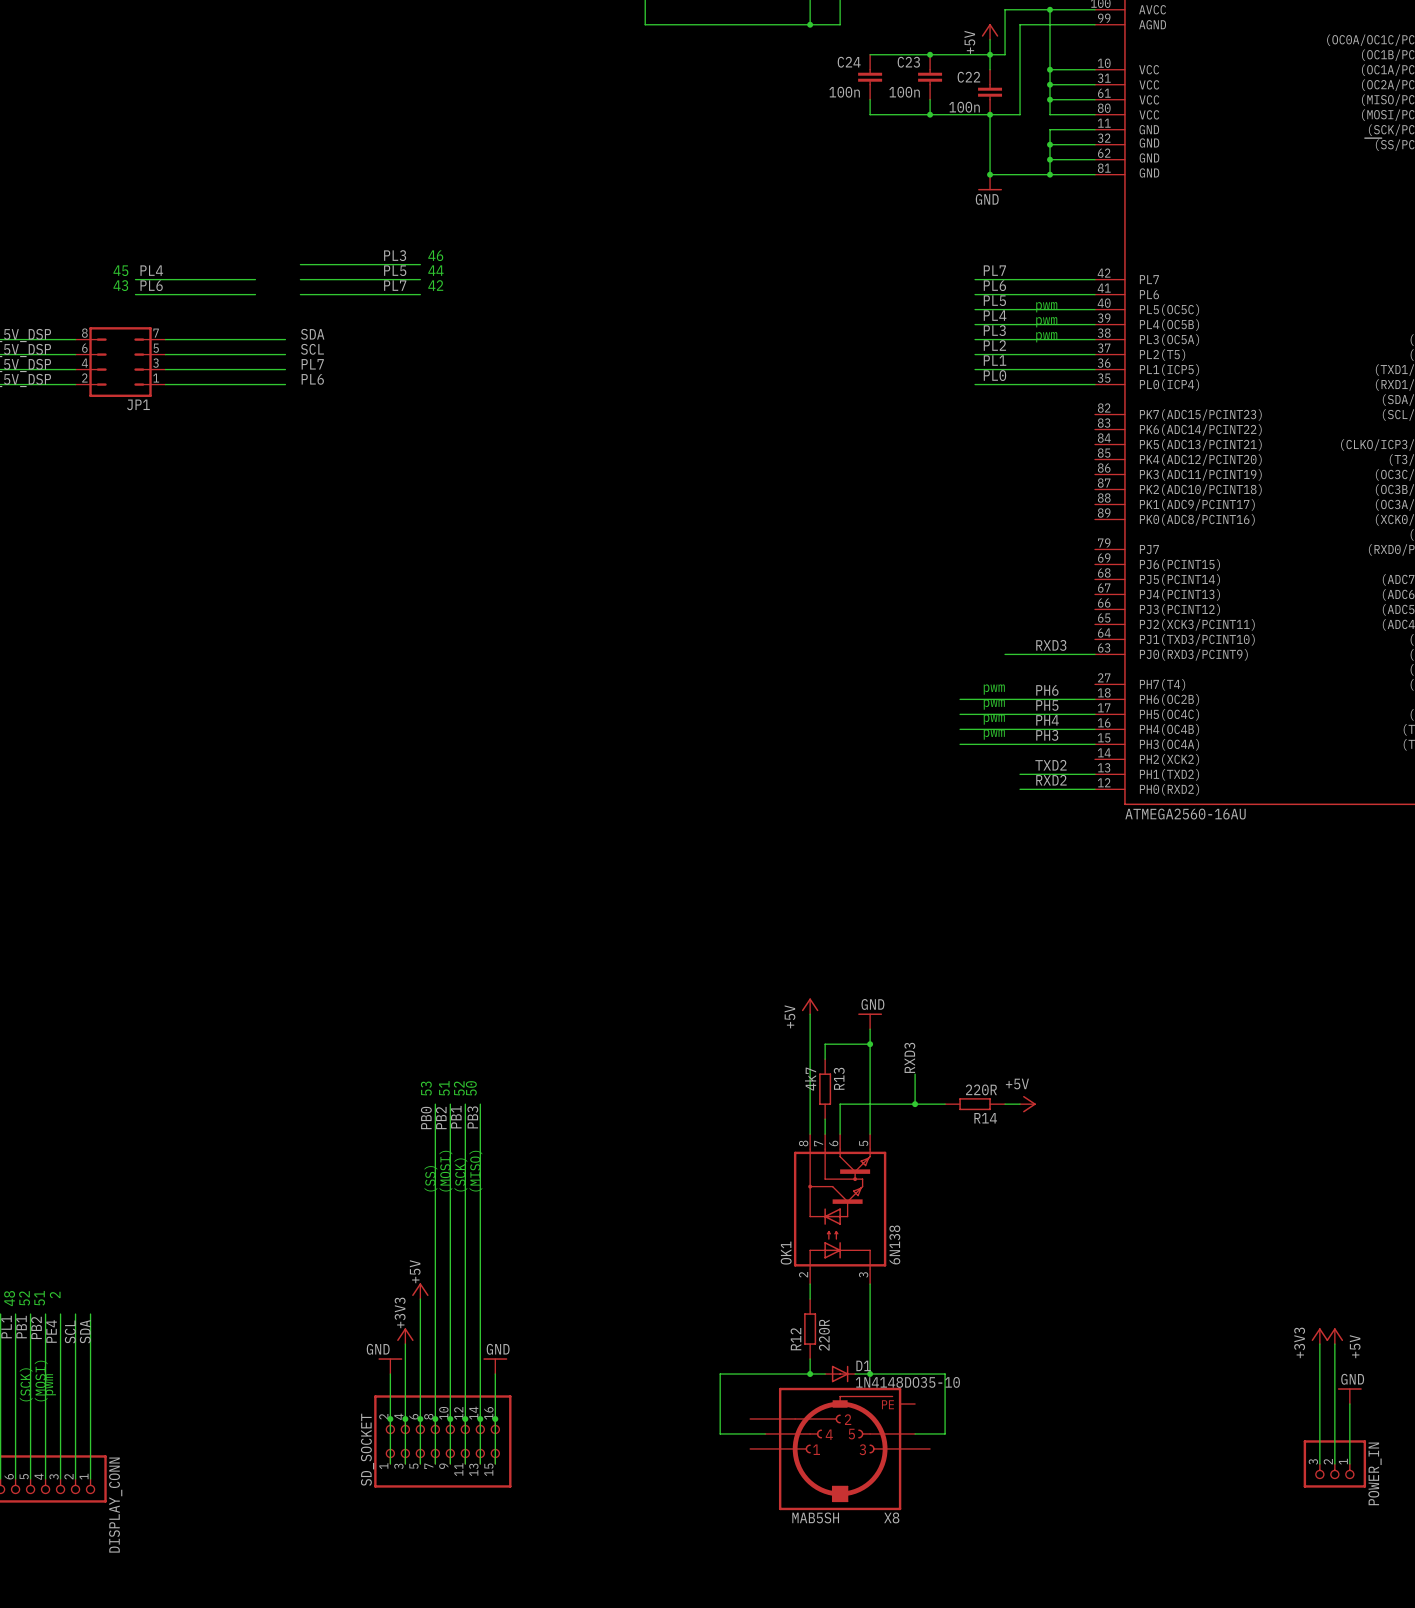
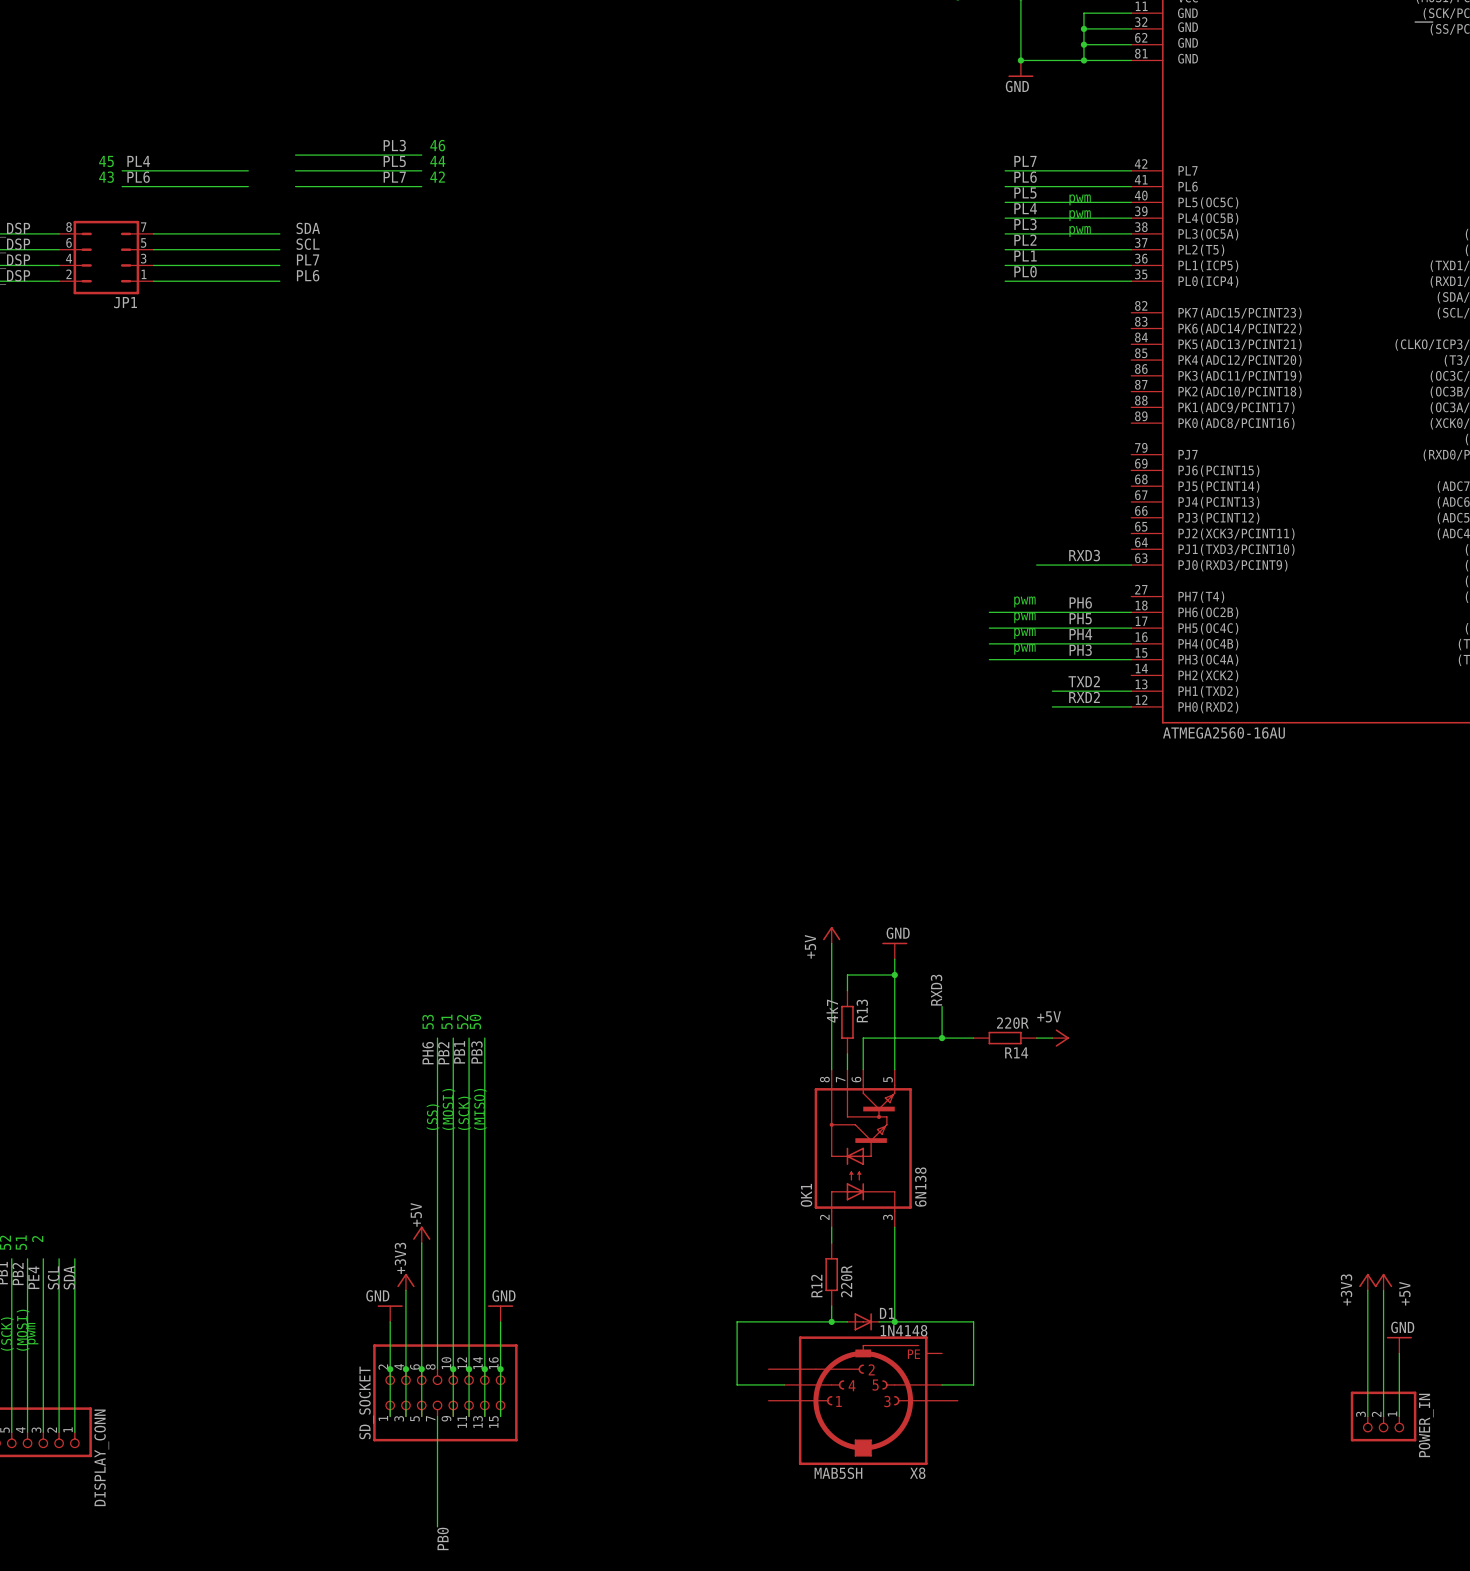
label: PB0 (426, 1117) -> PH6 (428, 1053)
D1 value: 1N4148DO35-10 (907, 1382) -> 1N4148 (903, 1330)
wire: (435, 1418) (435, 1463) -> (437, 1526) (437, 1416)
junction: (435, 1418) -> none
label: none -> PB0 (443, 1538)

